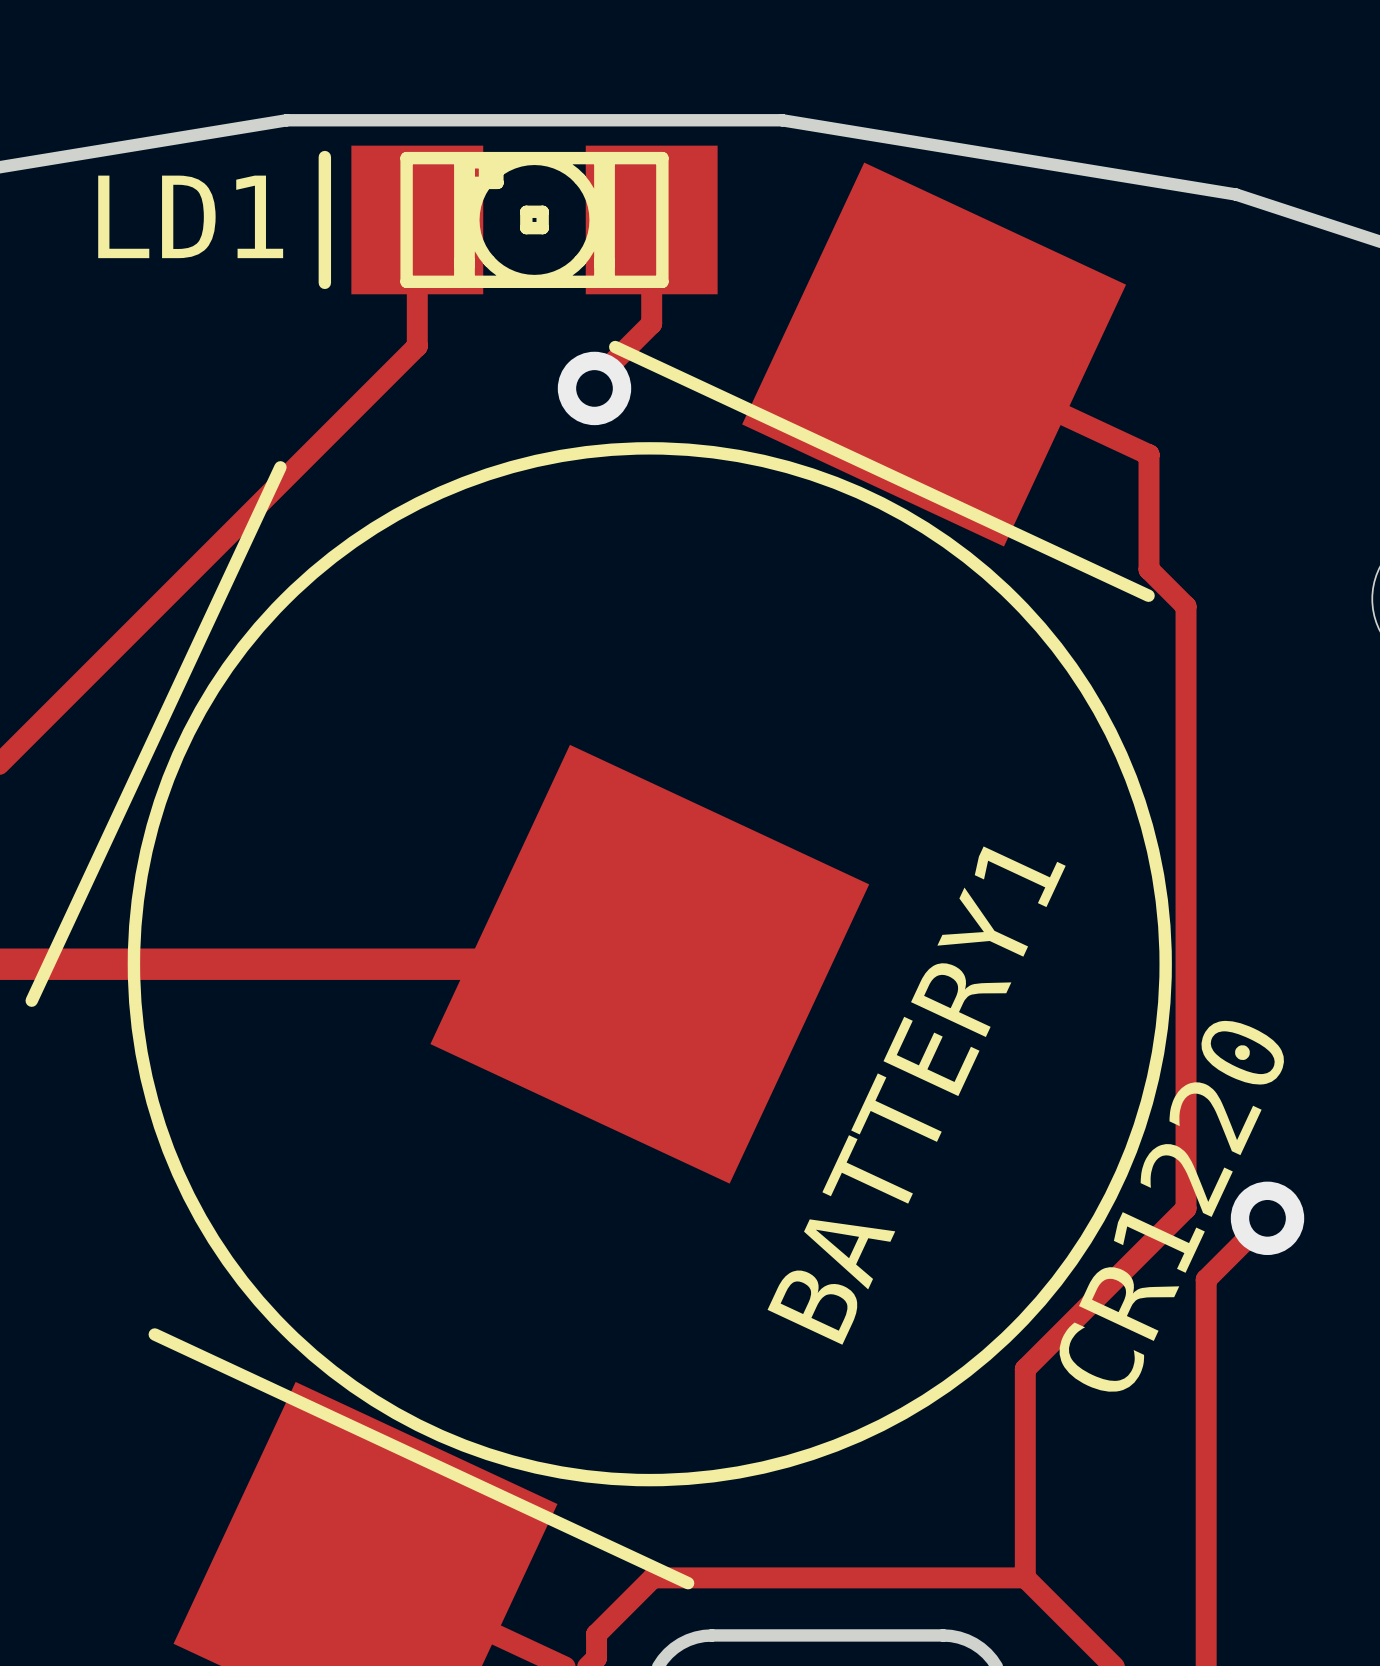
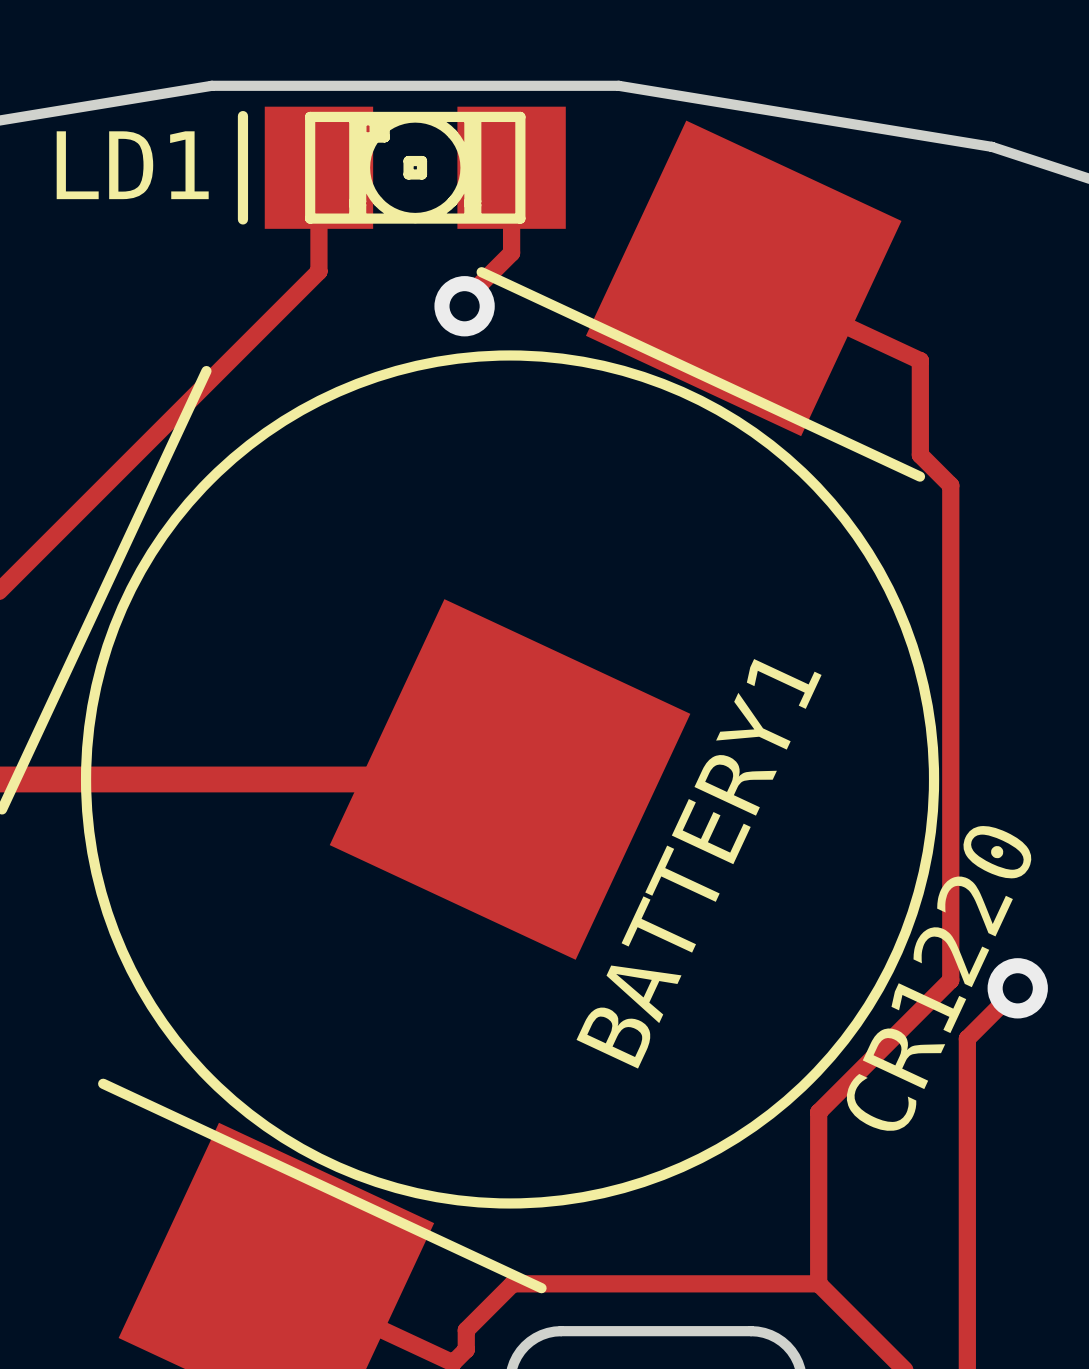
BATTERY1 name position: BATTERY1 (916, 1095) -> BATTERY1 (699, 863)

